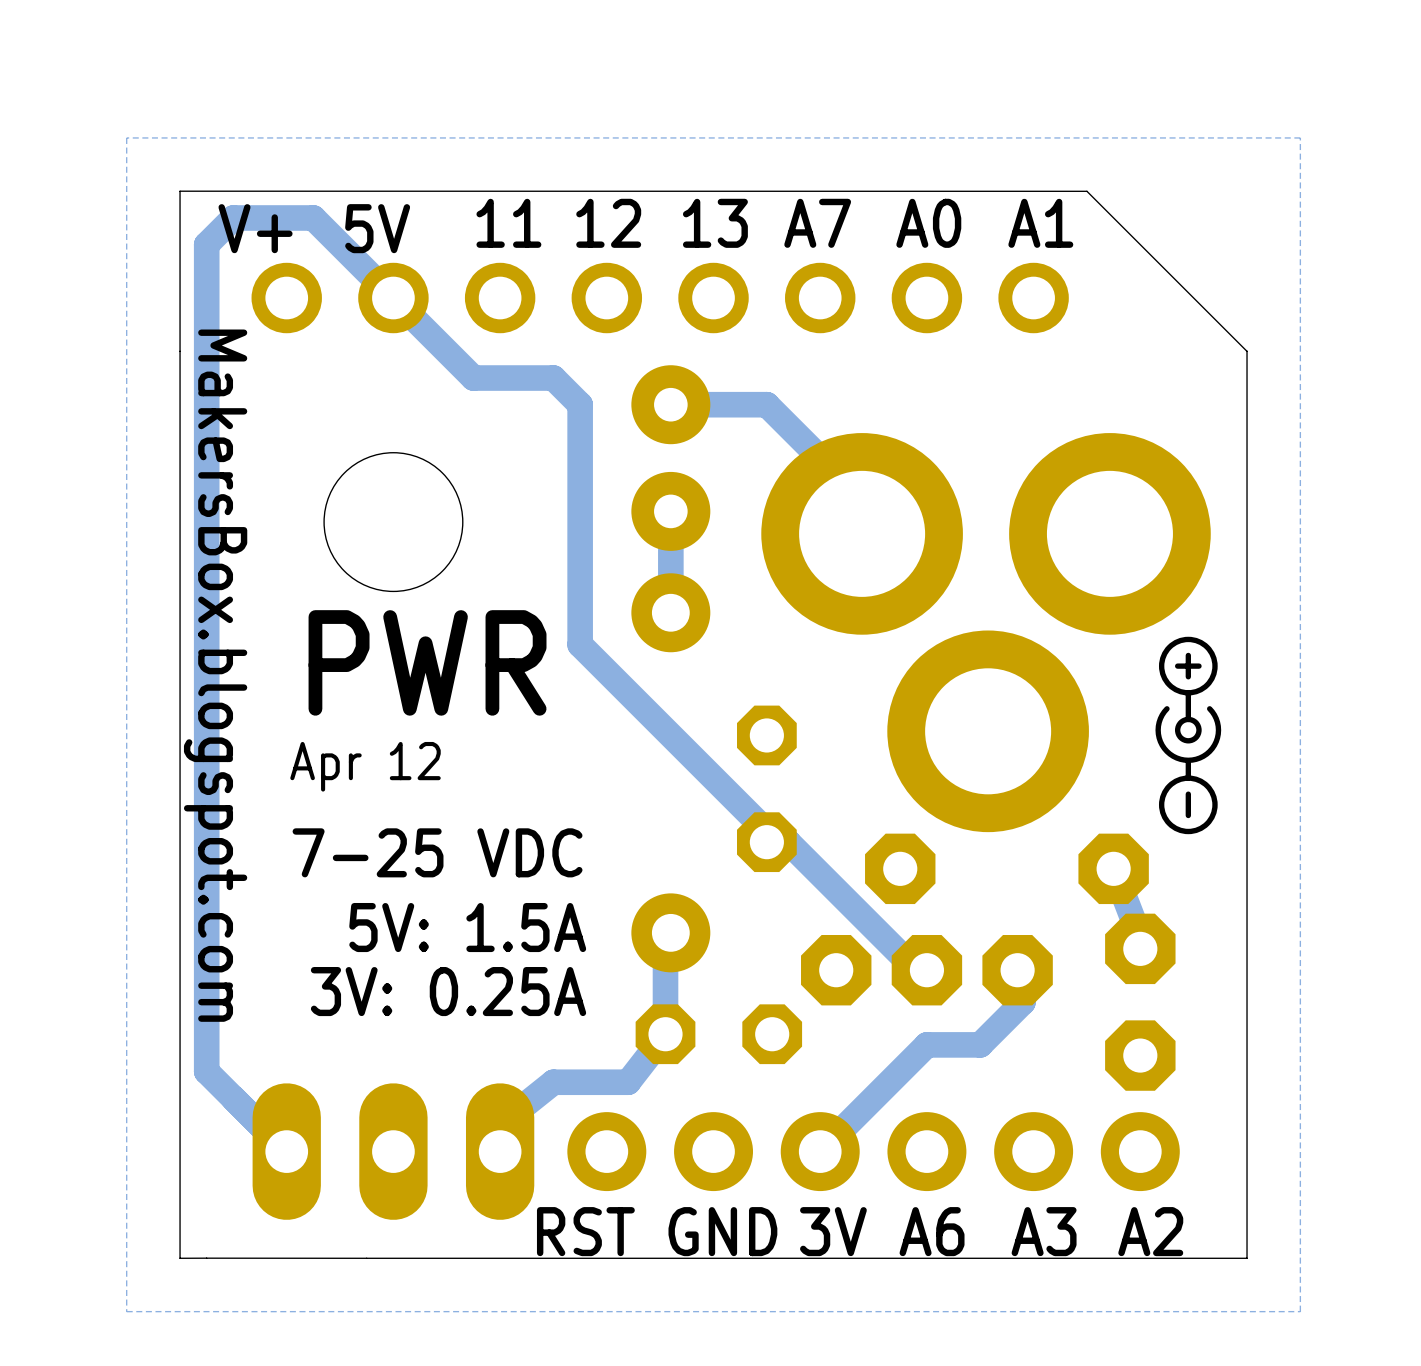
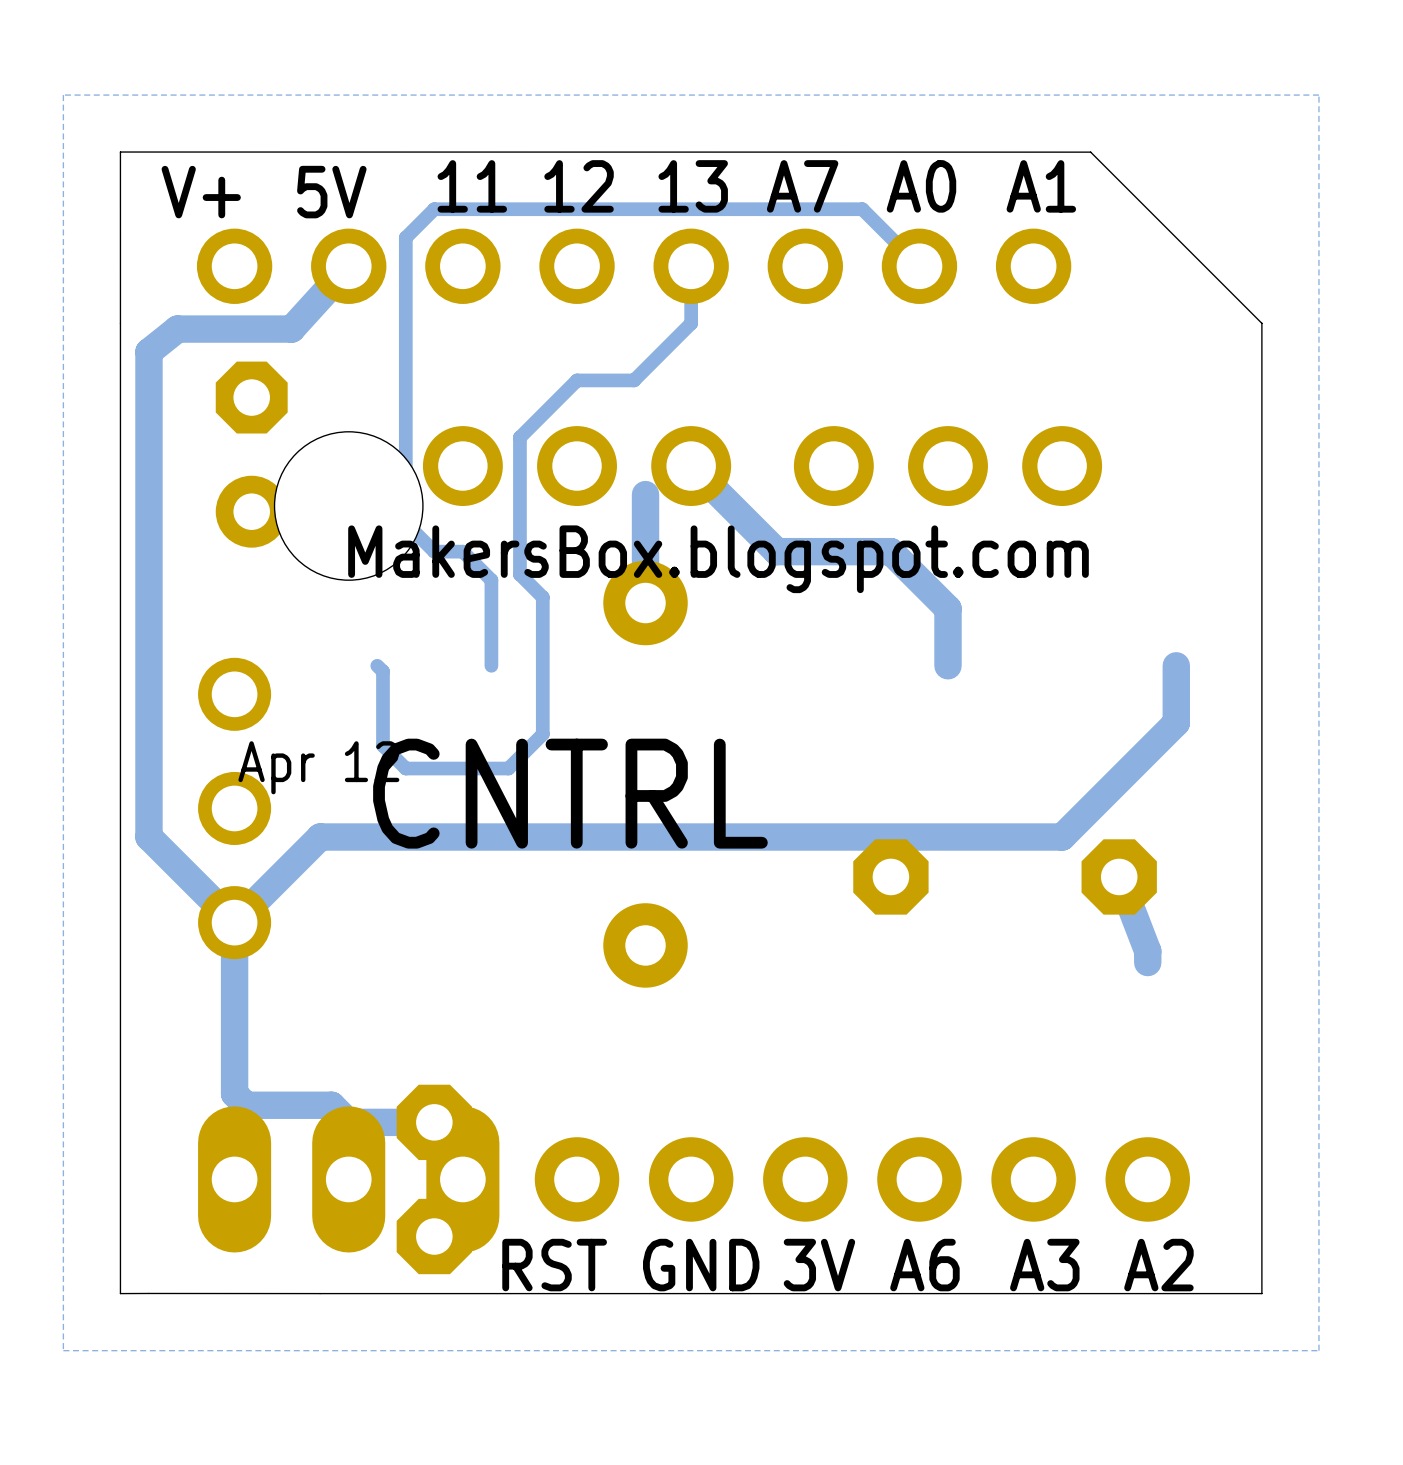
track: none -> (691, 266) (691, 323) (634, 380) (577, 380) (519, 437) (519, 574) (542, 597) (542, 734) (508, 768) (405, 768) (382, 745) (382, 671) (377, 665)
track: none -> (919, 266) (862, 209) (434, 209) (405, 237) (405, 523) (434, 551) (462, 551) (491, 580) (491, 665)
track: (206, 378) (206, 244) (233, 217) (313, 217) (473, 378) (553, 378) (580, 404) (580, 644) (766, 831) (766, 842) (788, 842) (916, 970) (926, 970) -> (148, 351) (177, 329) (291, 329) (348, 266)
track: (670, 404) (766, 404) (862, 499) (862, 533) -> none
part: (670, 458) -> none
part: none -> (251, 454)
part: none -> (577, 466)
track: none -> (691, 466) (776, 551) (890, 551) (948, 608) (948, 665)
part: none -> (948, 466)
part: (986, 632) -> none
drawing: [1155, 636, 1222, 835] -> none
text: PWR (427, 662) -> none
track: none -> (1176, 665) (1176, 722) (1062, 837) (320, 837) (234, 922)
text rotation: 0° (215, 675) -> 90° counterclockwise (718, 559)
part: (766, 788) -> none
text: none -> CNTRL (570, 793)
part: none -> (234, 808)
track: (206, 831) (206, 1071) (286, 1151) -> (148, 837) (234, 922)
text: 7-25 VDC (437, 852) -> none
track: none -> (234, 922) (234, 1093) (246, 1105) (331, 1105) (348, 1122) (434, 1122)
text: 5V: 1.5A (467, 927) -> none
track: (670, 932) (665, 943) (665, 1034) (628, 1082) (553, 1082) (500, 1124) (500, 1151) -> none
part: (926, 970) -> none
track: (1017, 970) (1022, 1002) (980, 1044) (926, 1044) (820, 1151) -> none
text: 3V: 0.25A (448, 991) -> none
part position: (1140, 1002) -> (434, 1179)
part: (718, 1034) -> none

